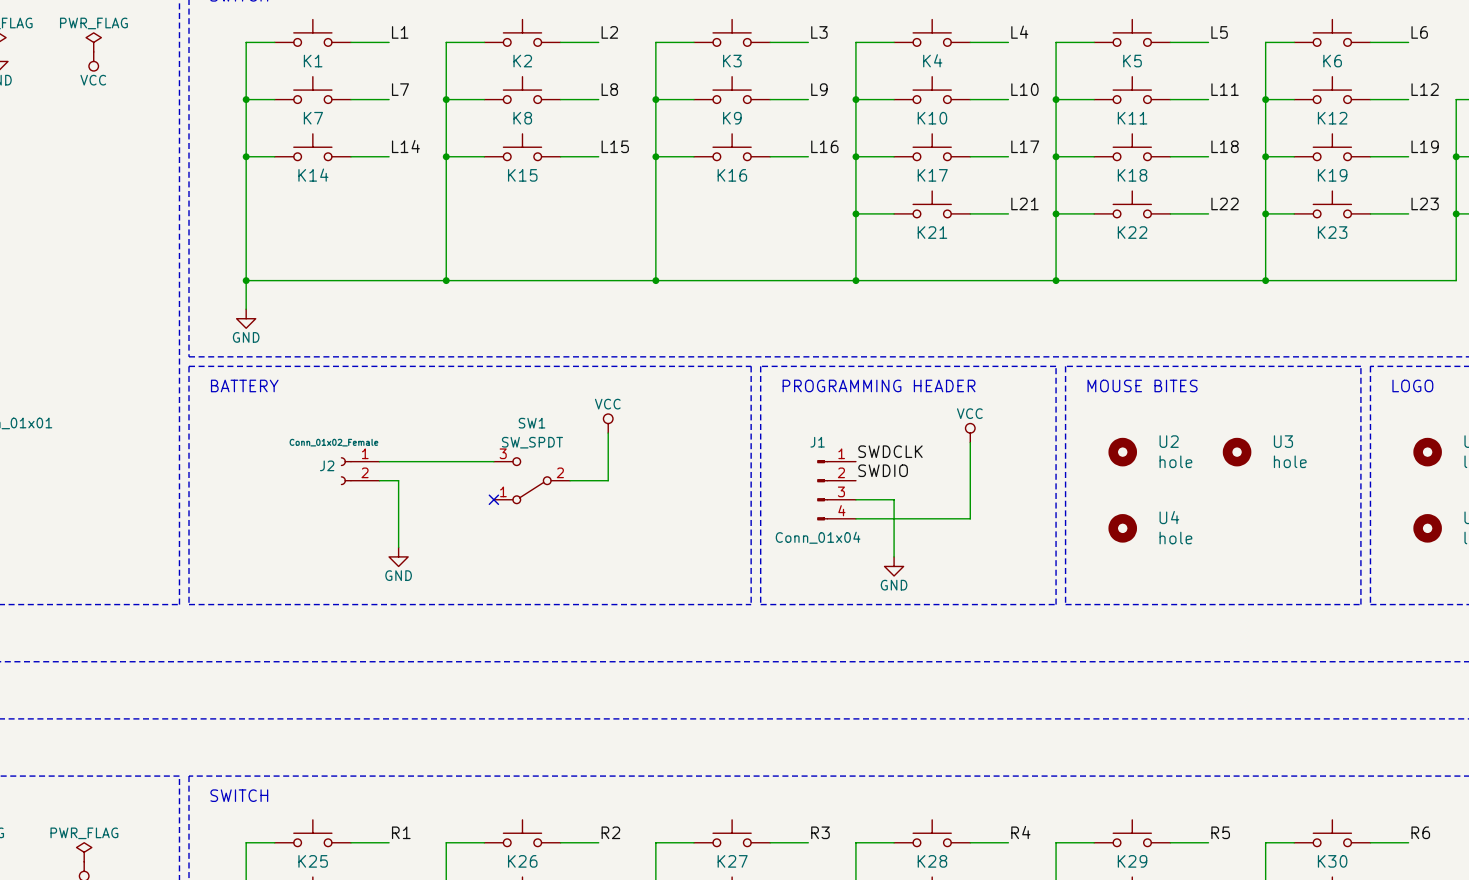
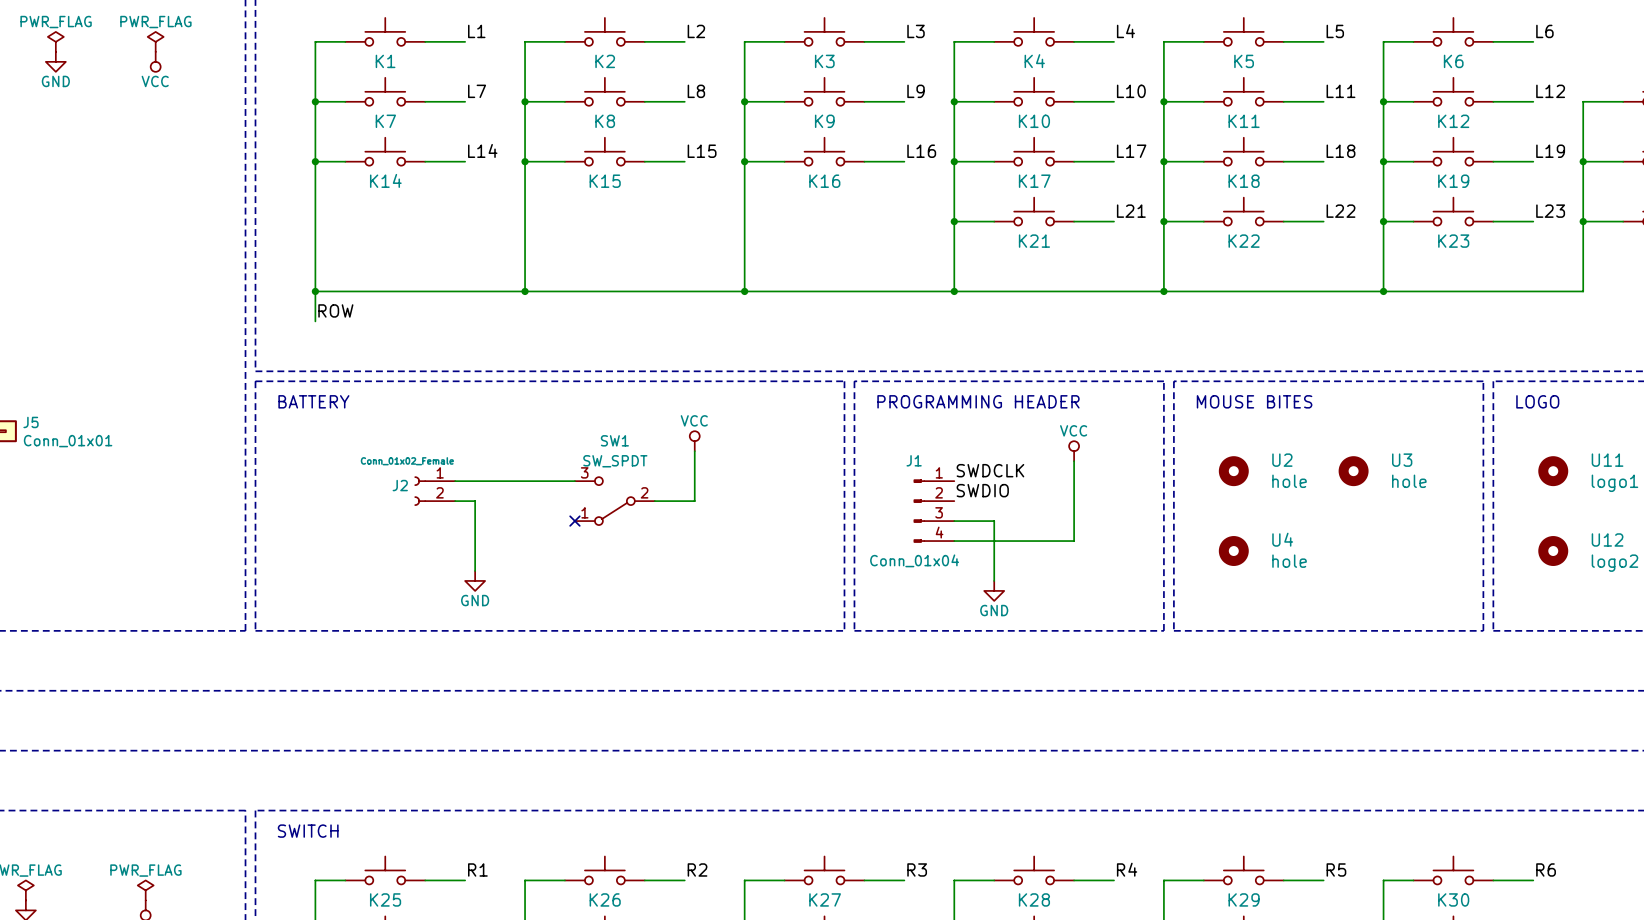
label: none -> ROW (335, 310)
power symbol: GND (246, 318) -> none

